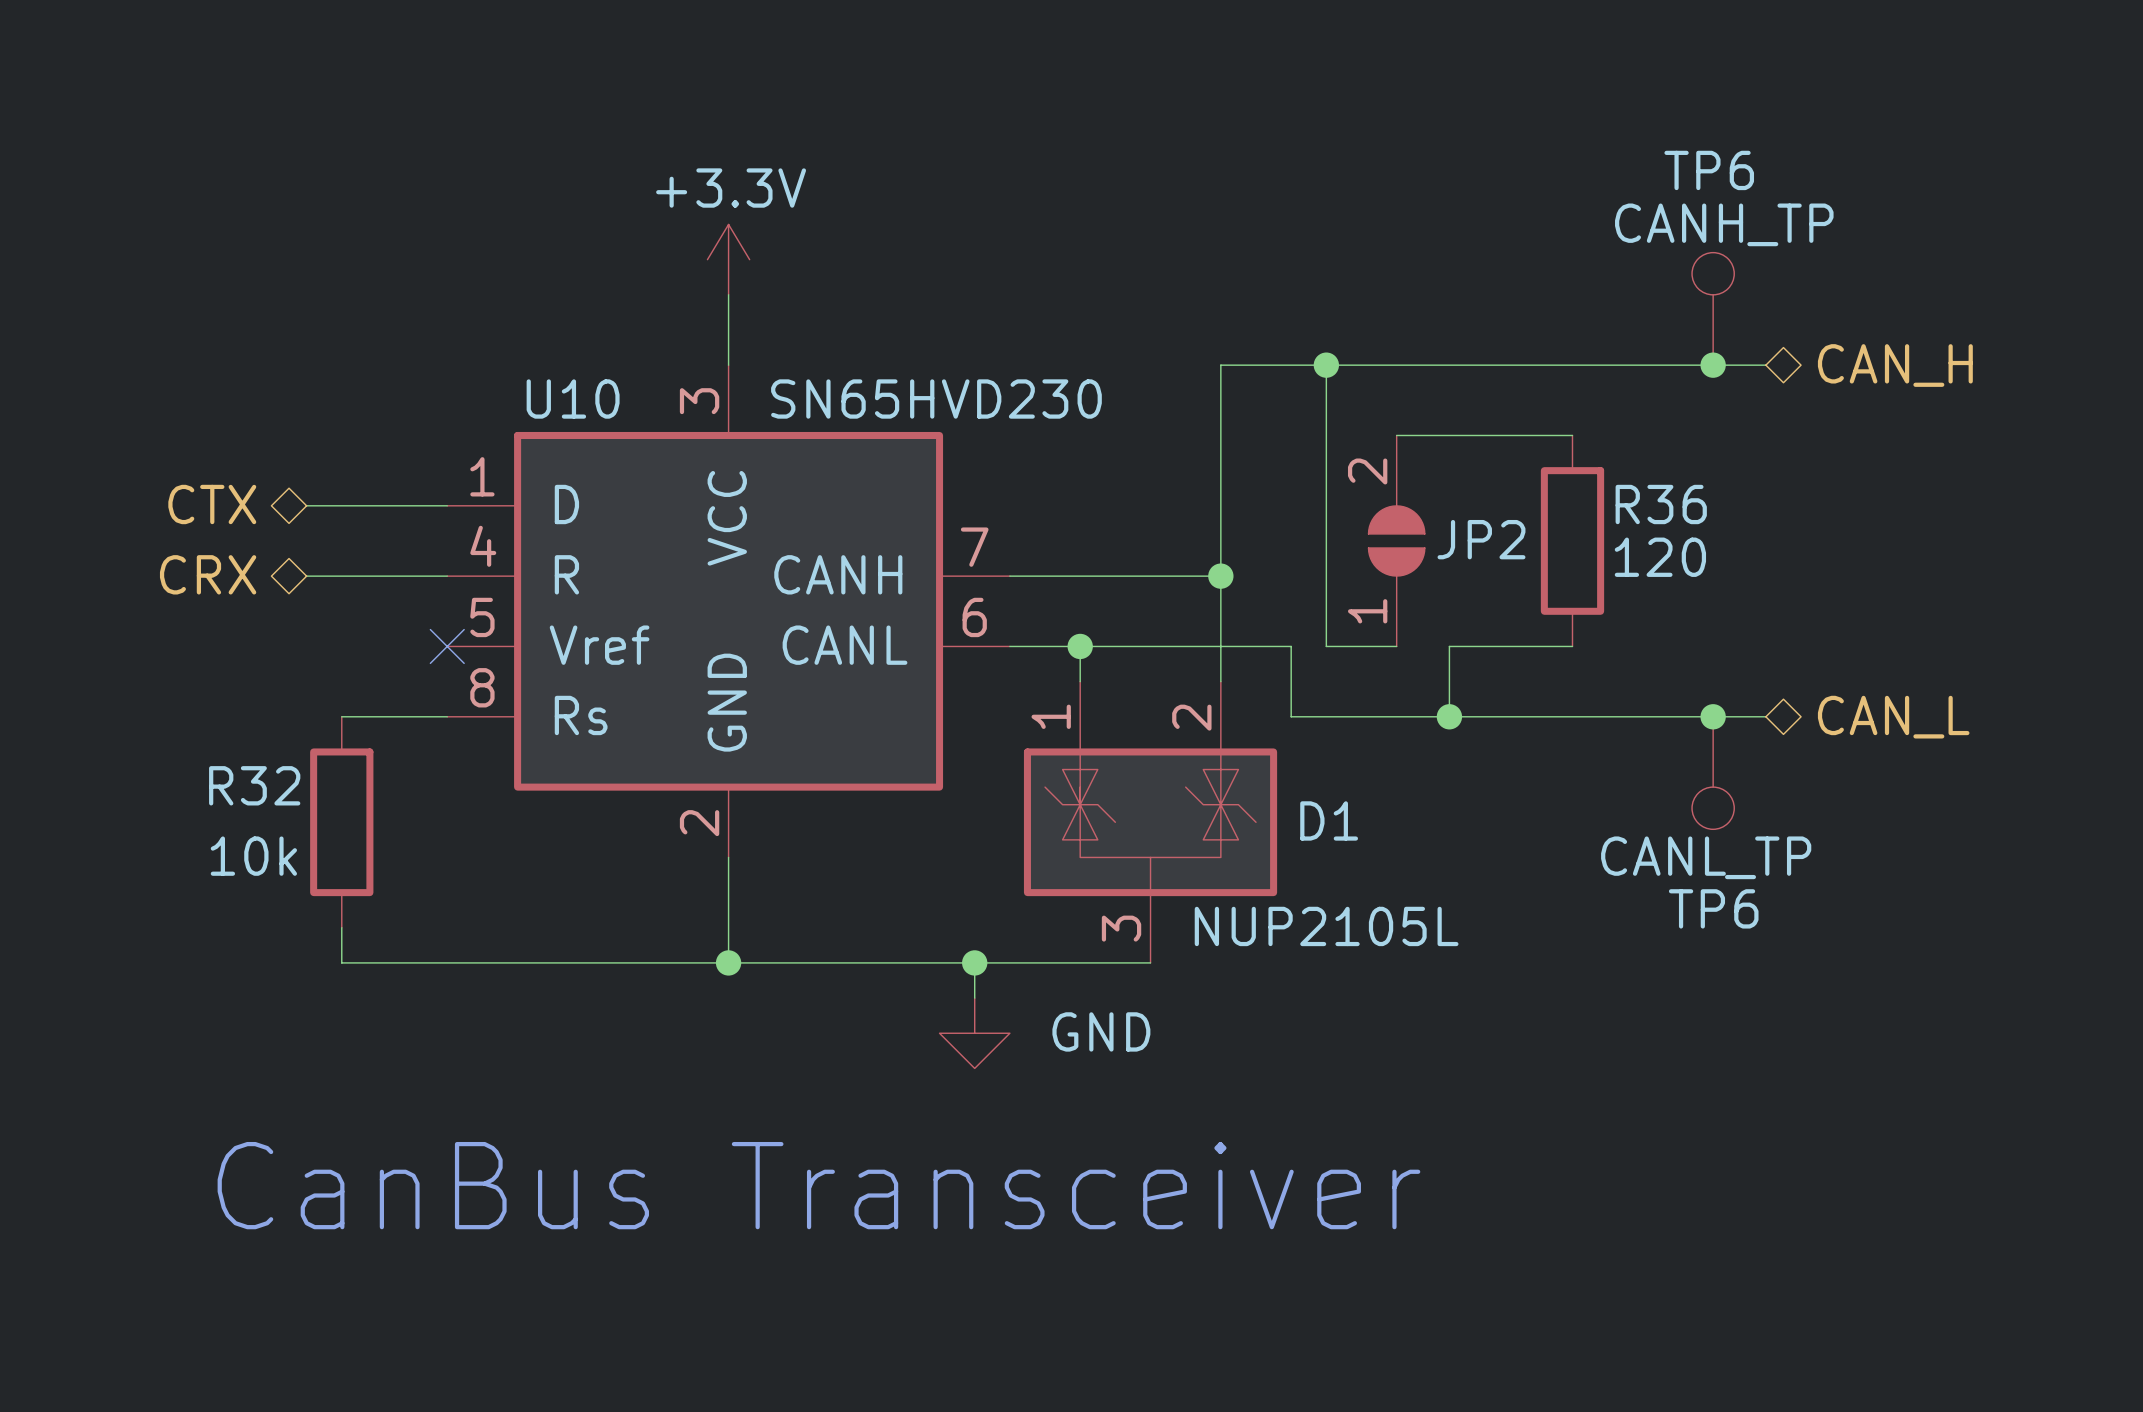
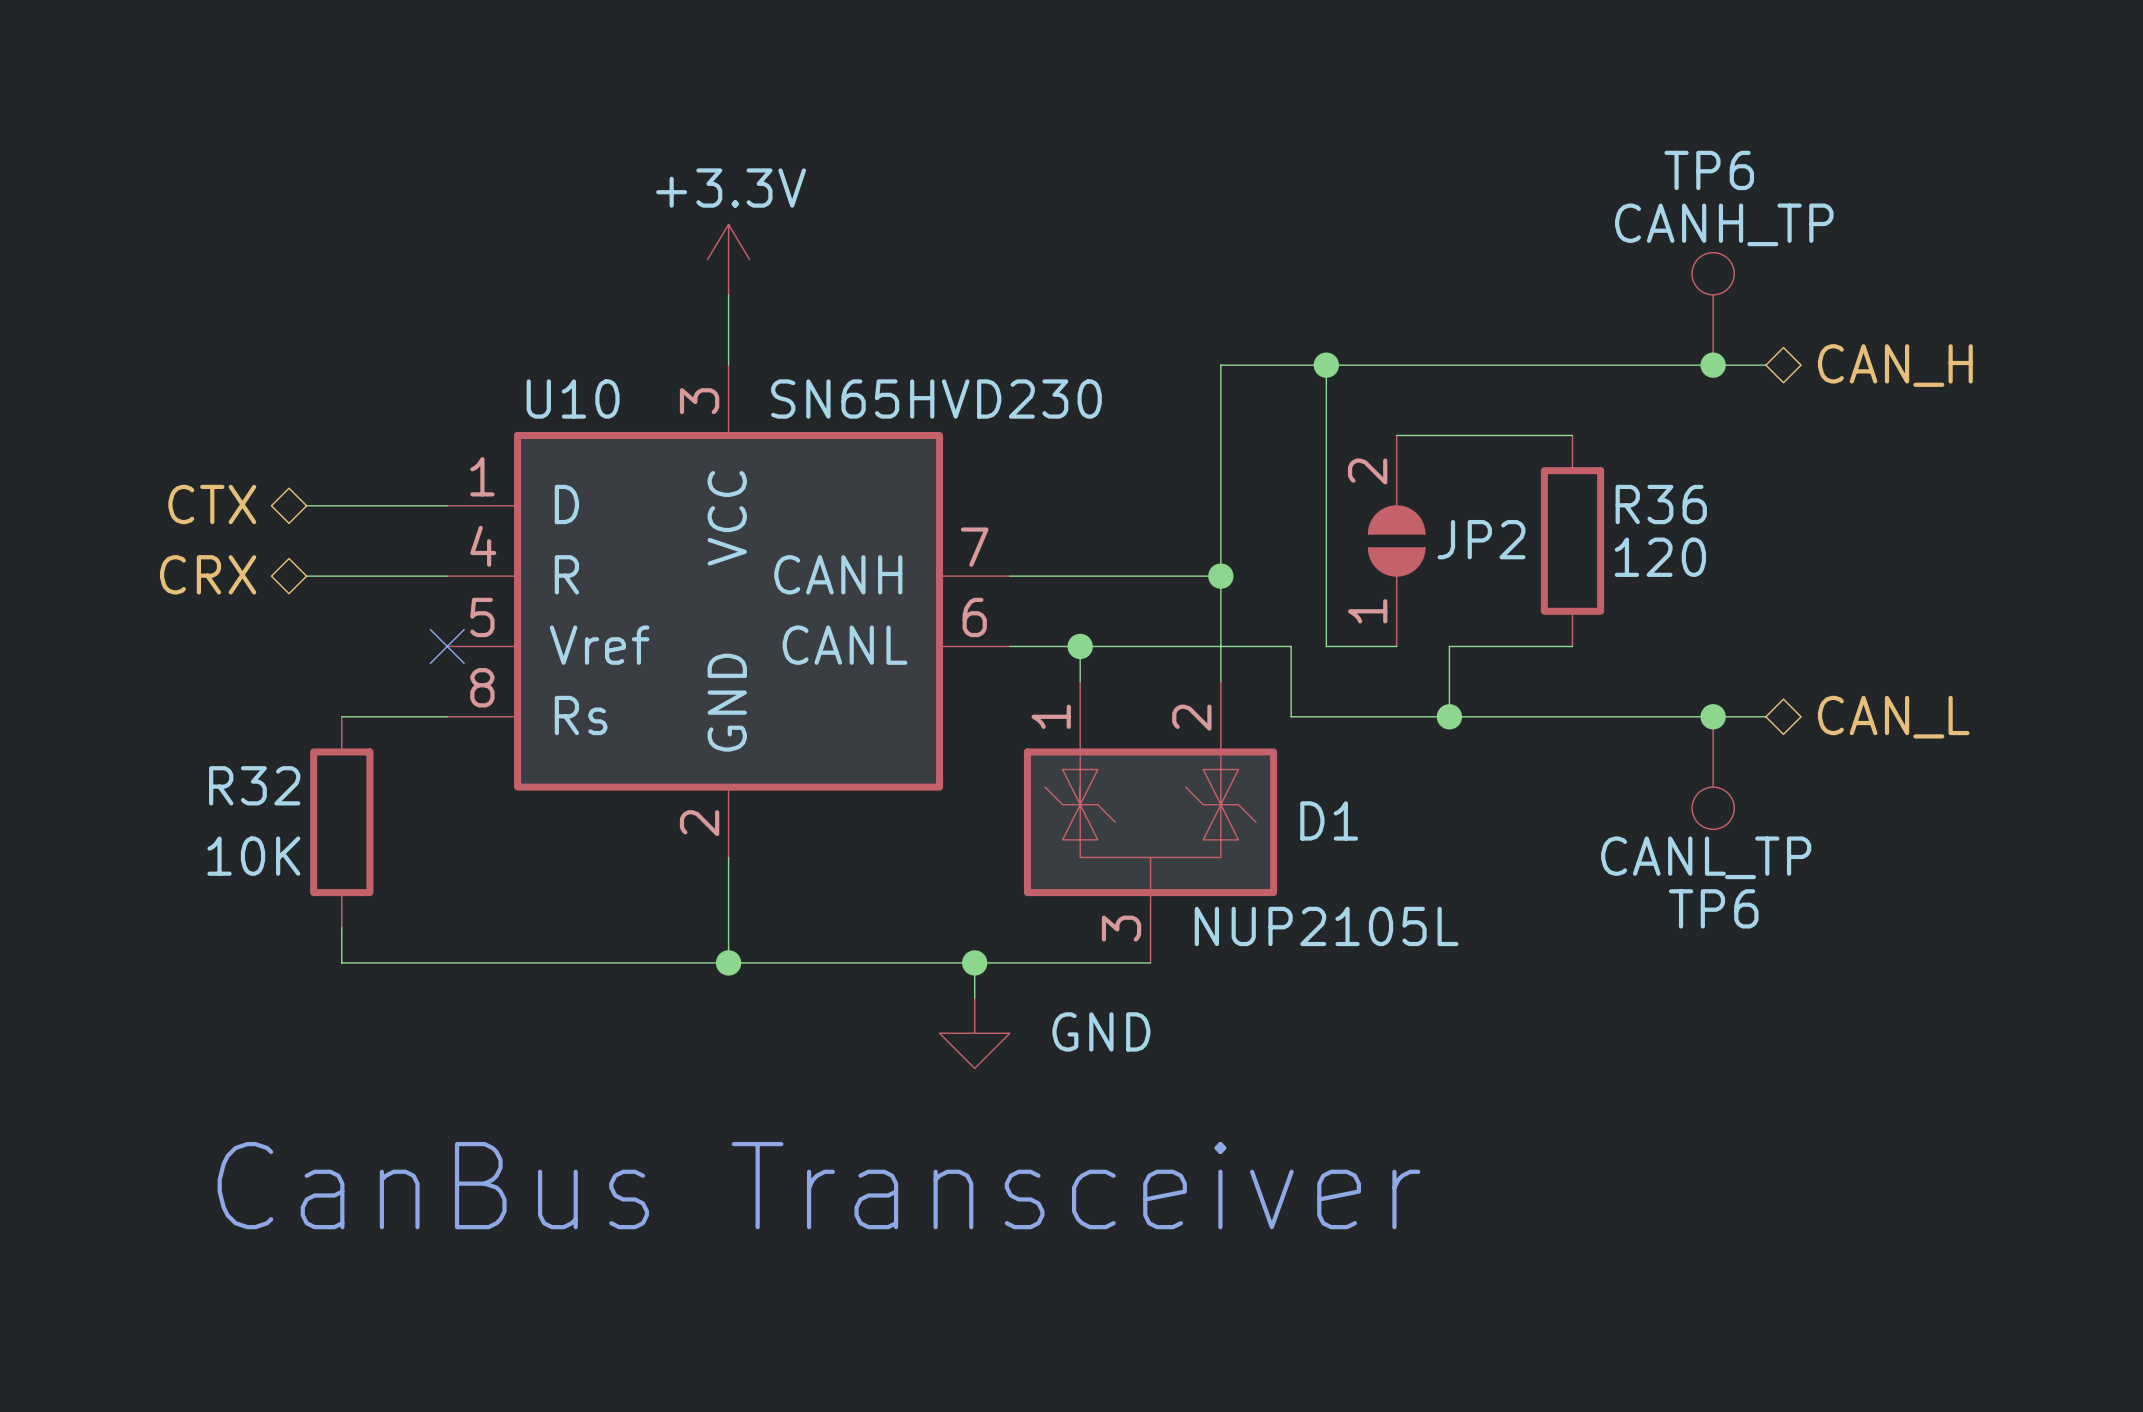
R32 value: 10k (253, 856) -> 10K (253, 856)

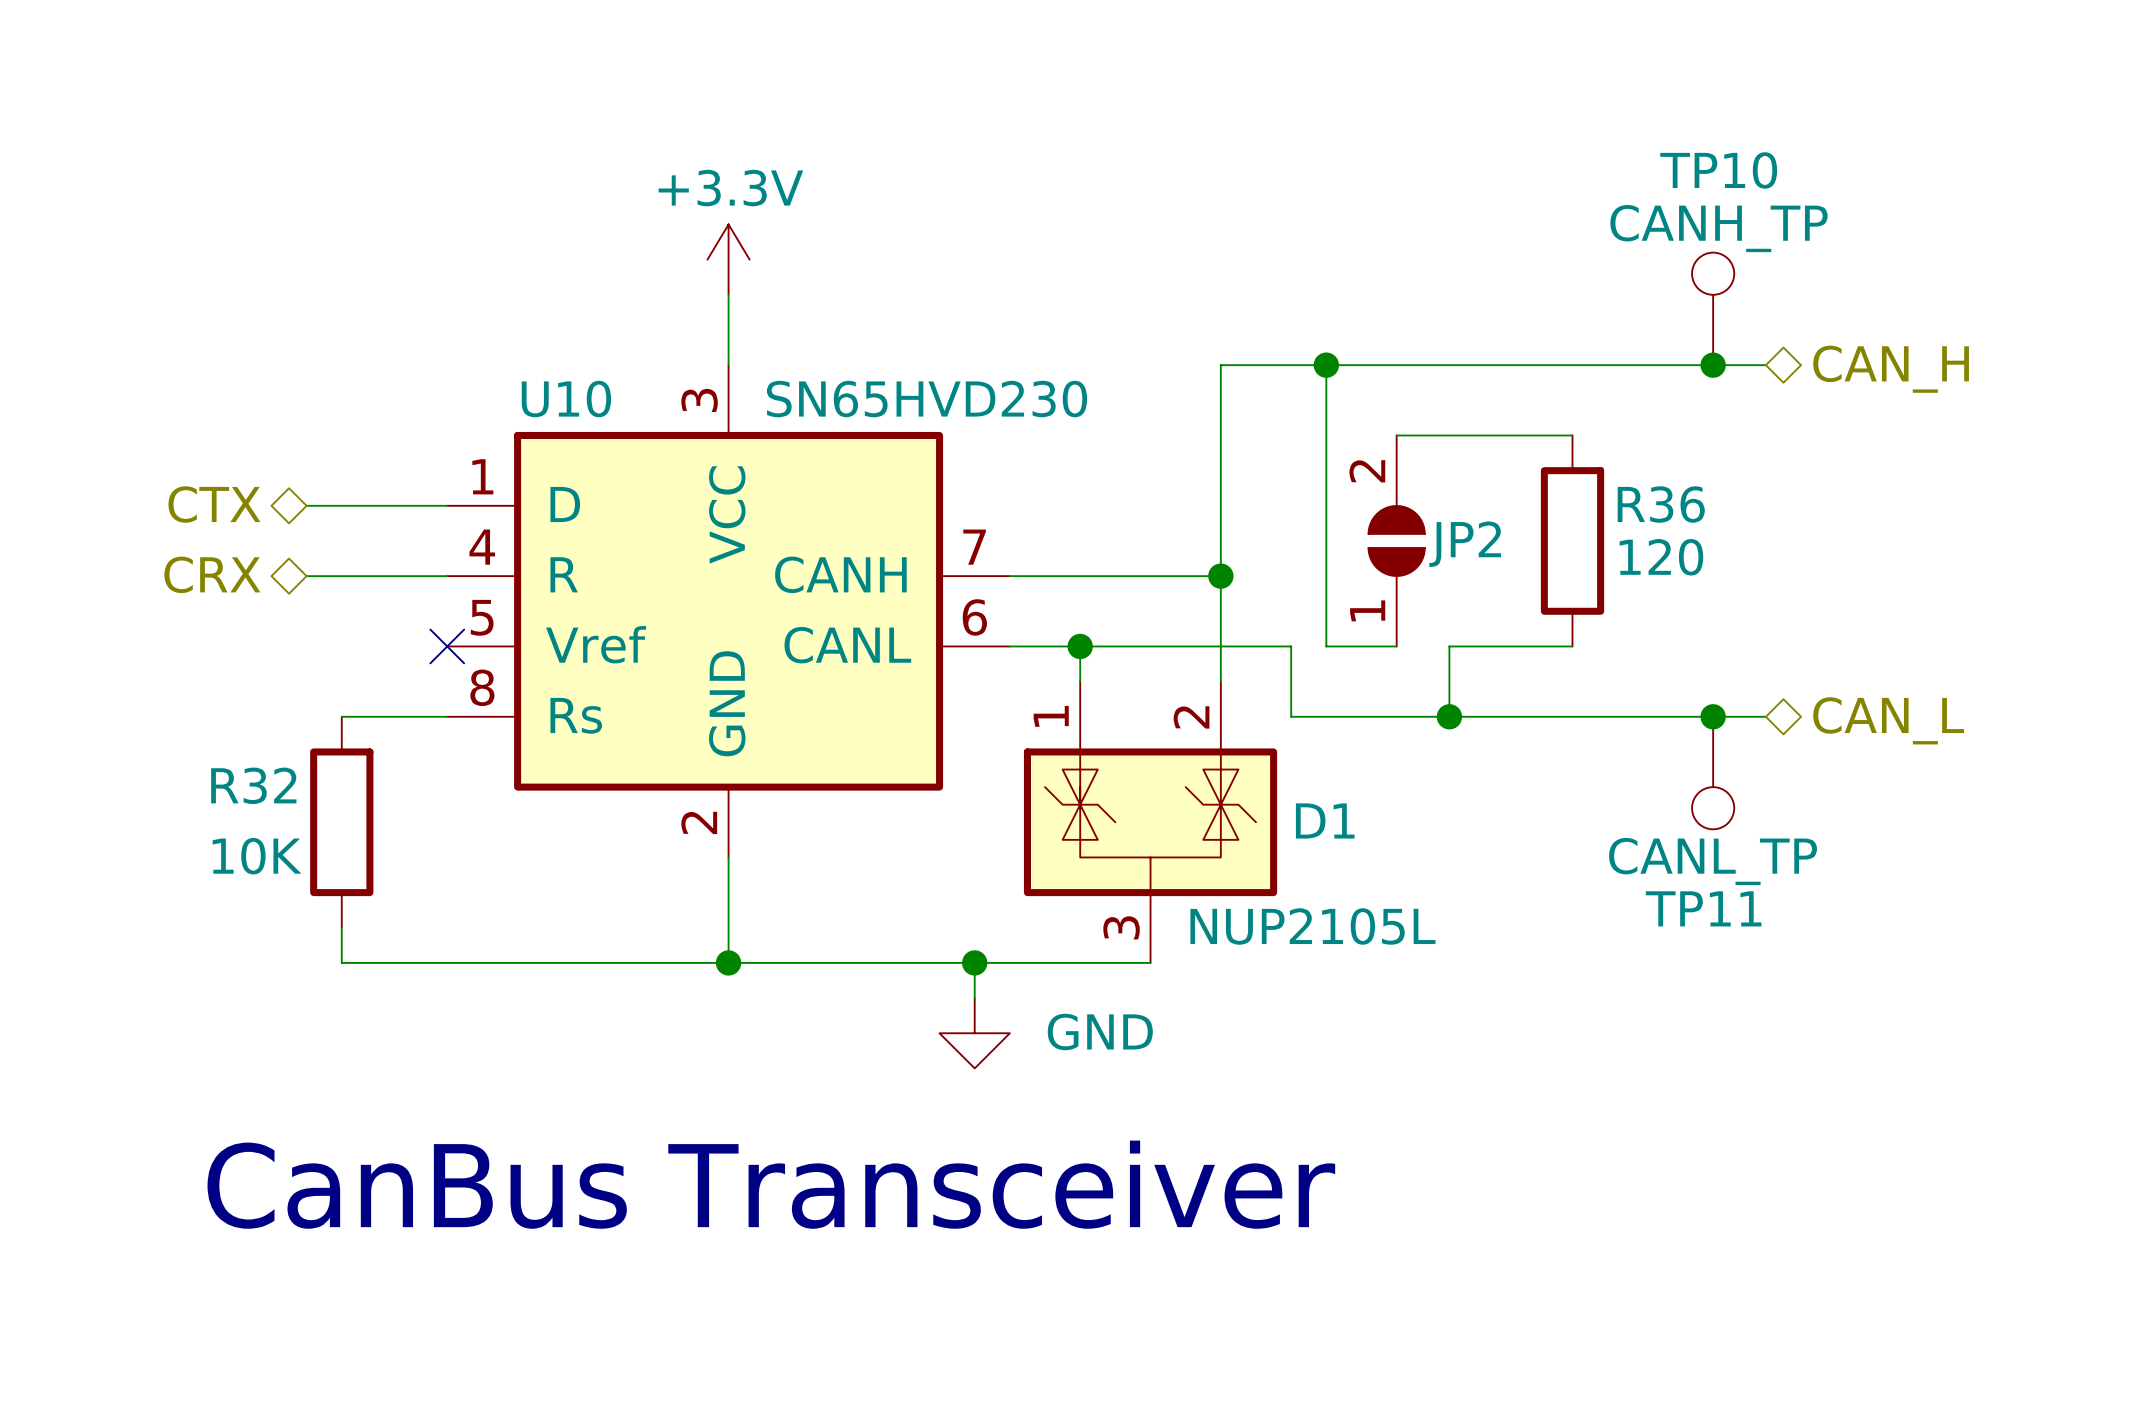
TP6 name: TP6 (1709, 170) -> TP10 (1718, 170)
TP6 name: TP6 (1713, 908) -> TP11 (1703, 908)

